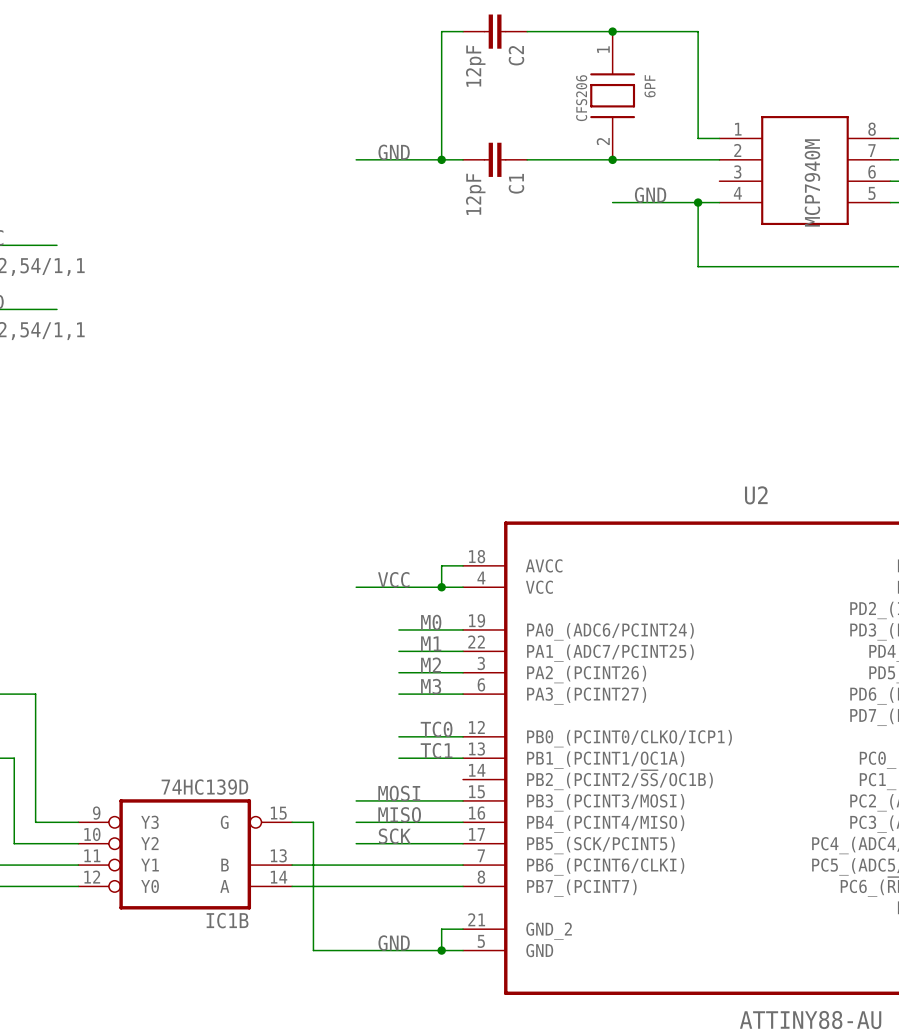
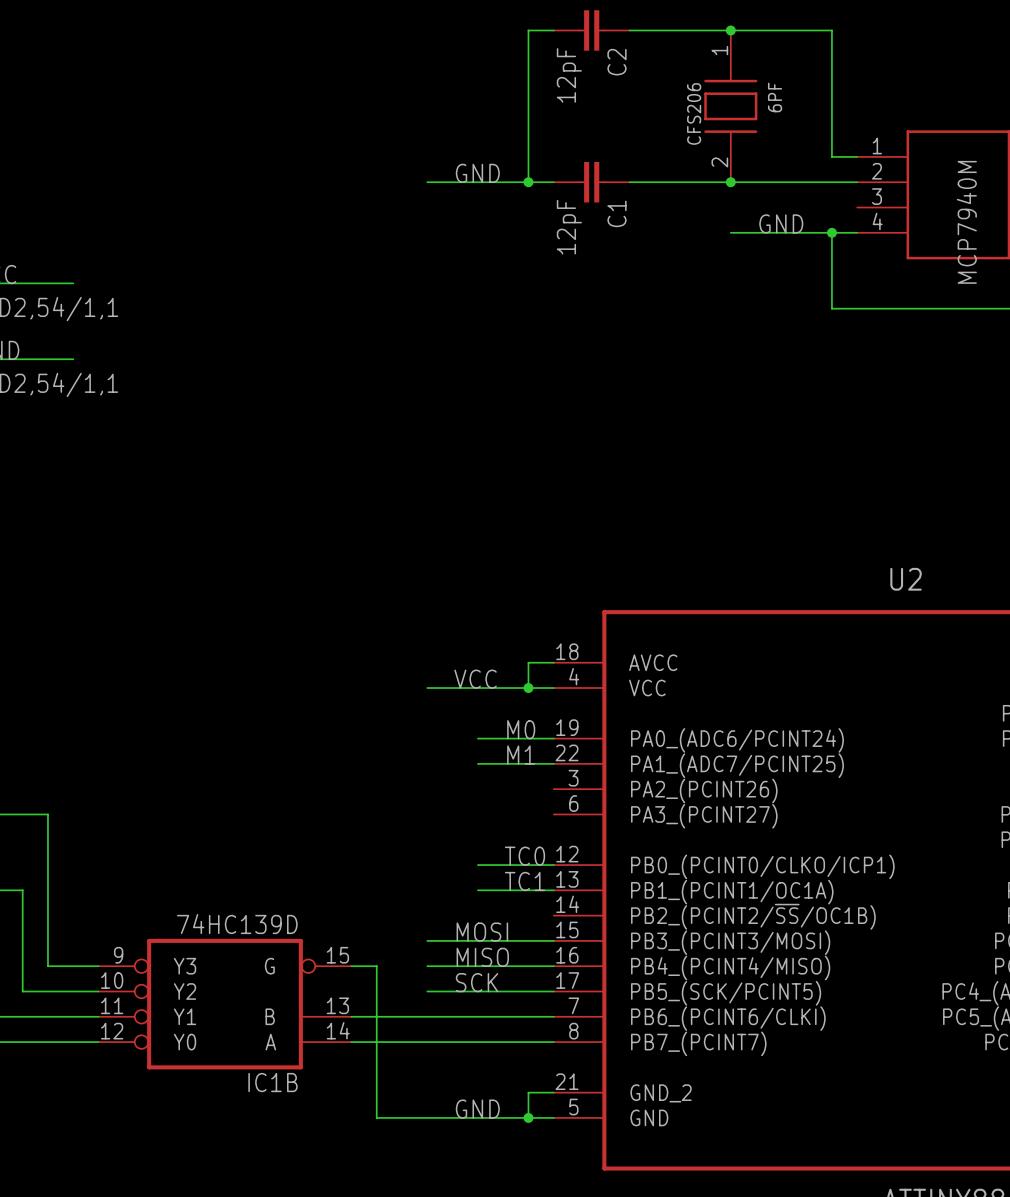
label: M2 (431, 665) -> none
wire: (398, 672) (463, 672) -> none
label: M3 (431, 686) -> none
wire: (398, 694) (463, 694) -> none

